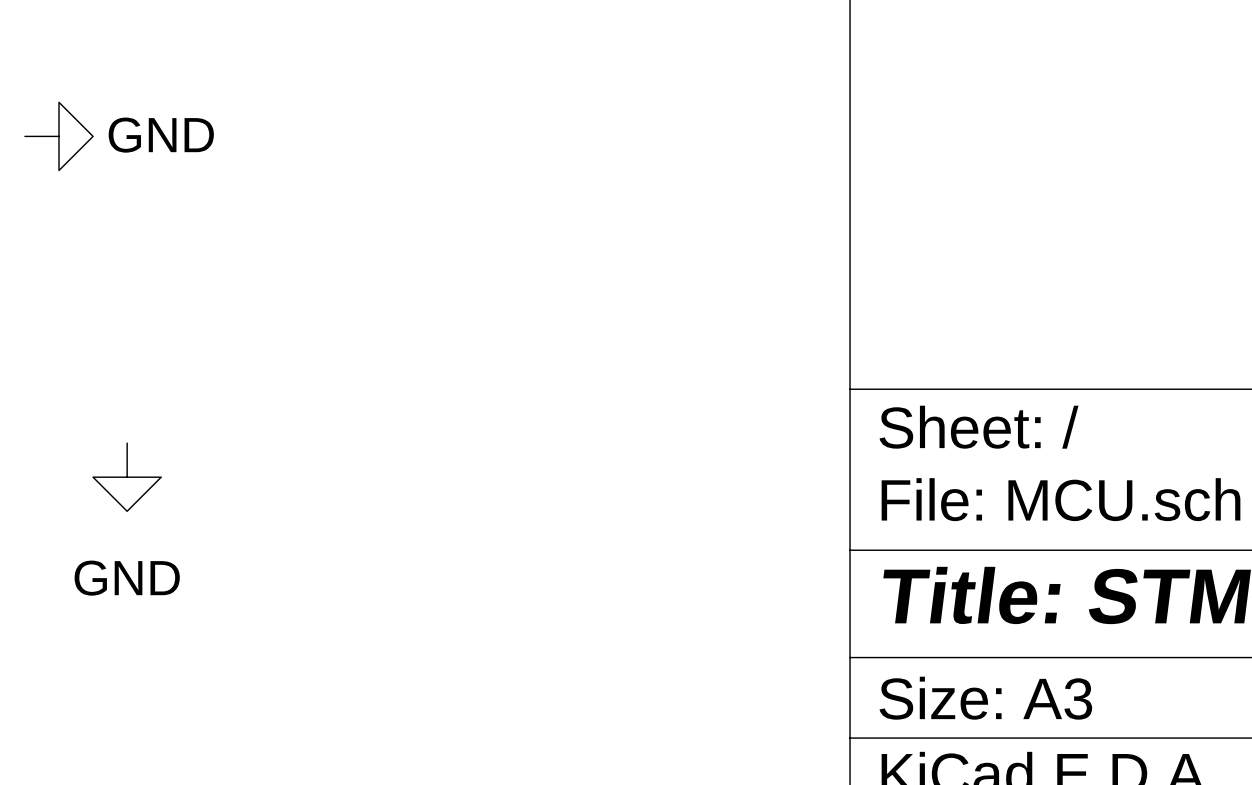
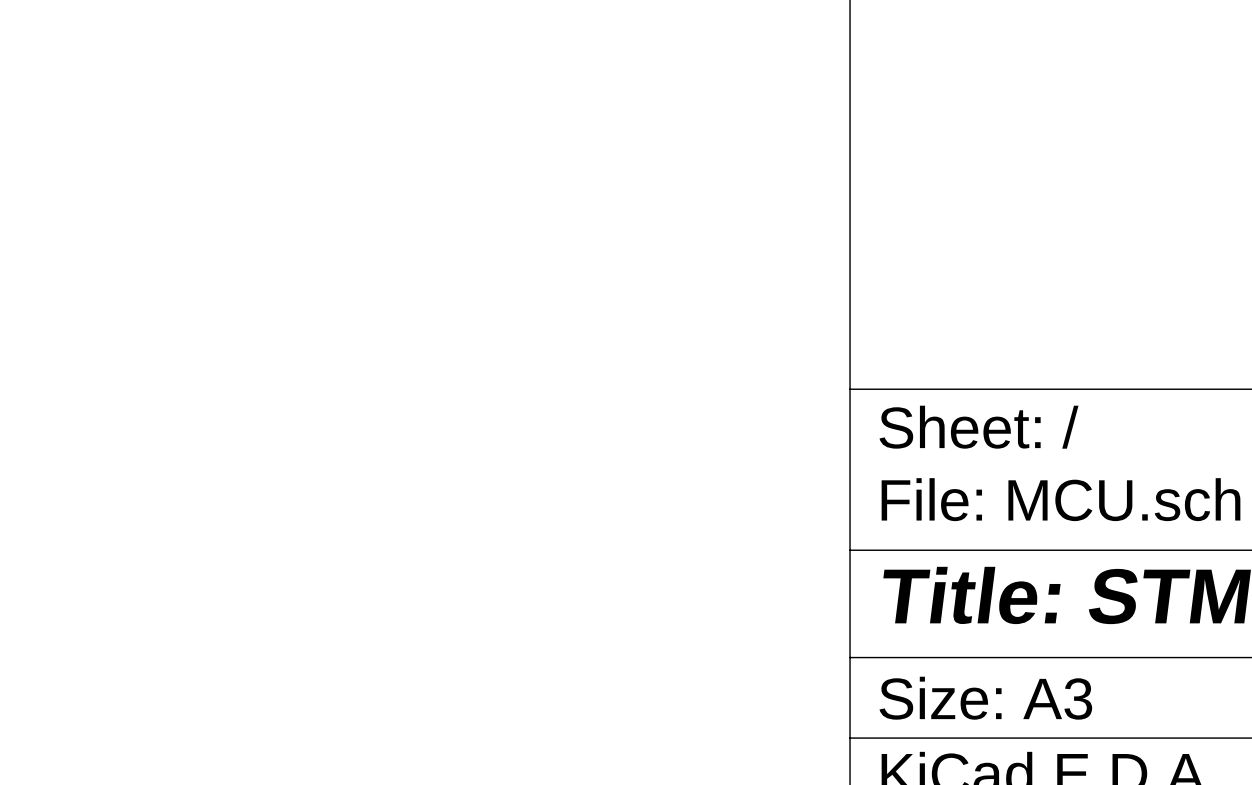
power symbol: GND (59, 136) -> none
power symbol: GND (127, 477) -> none

